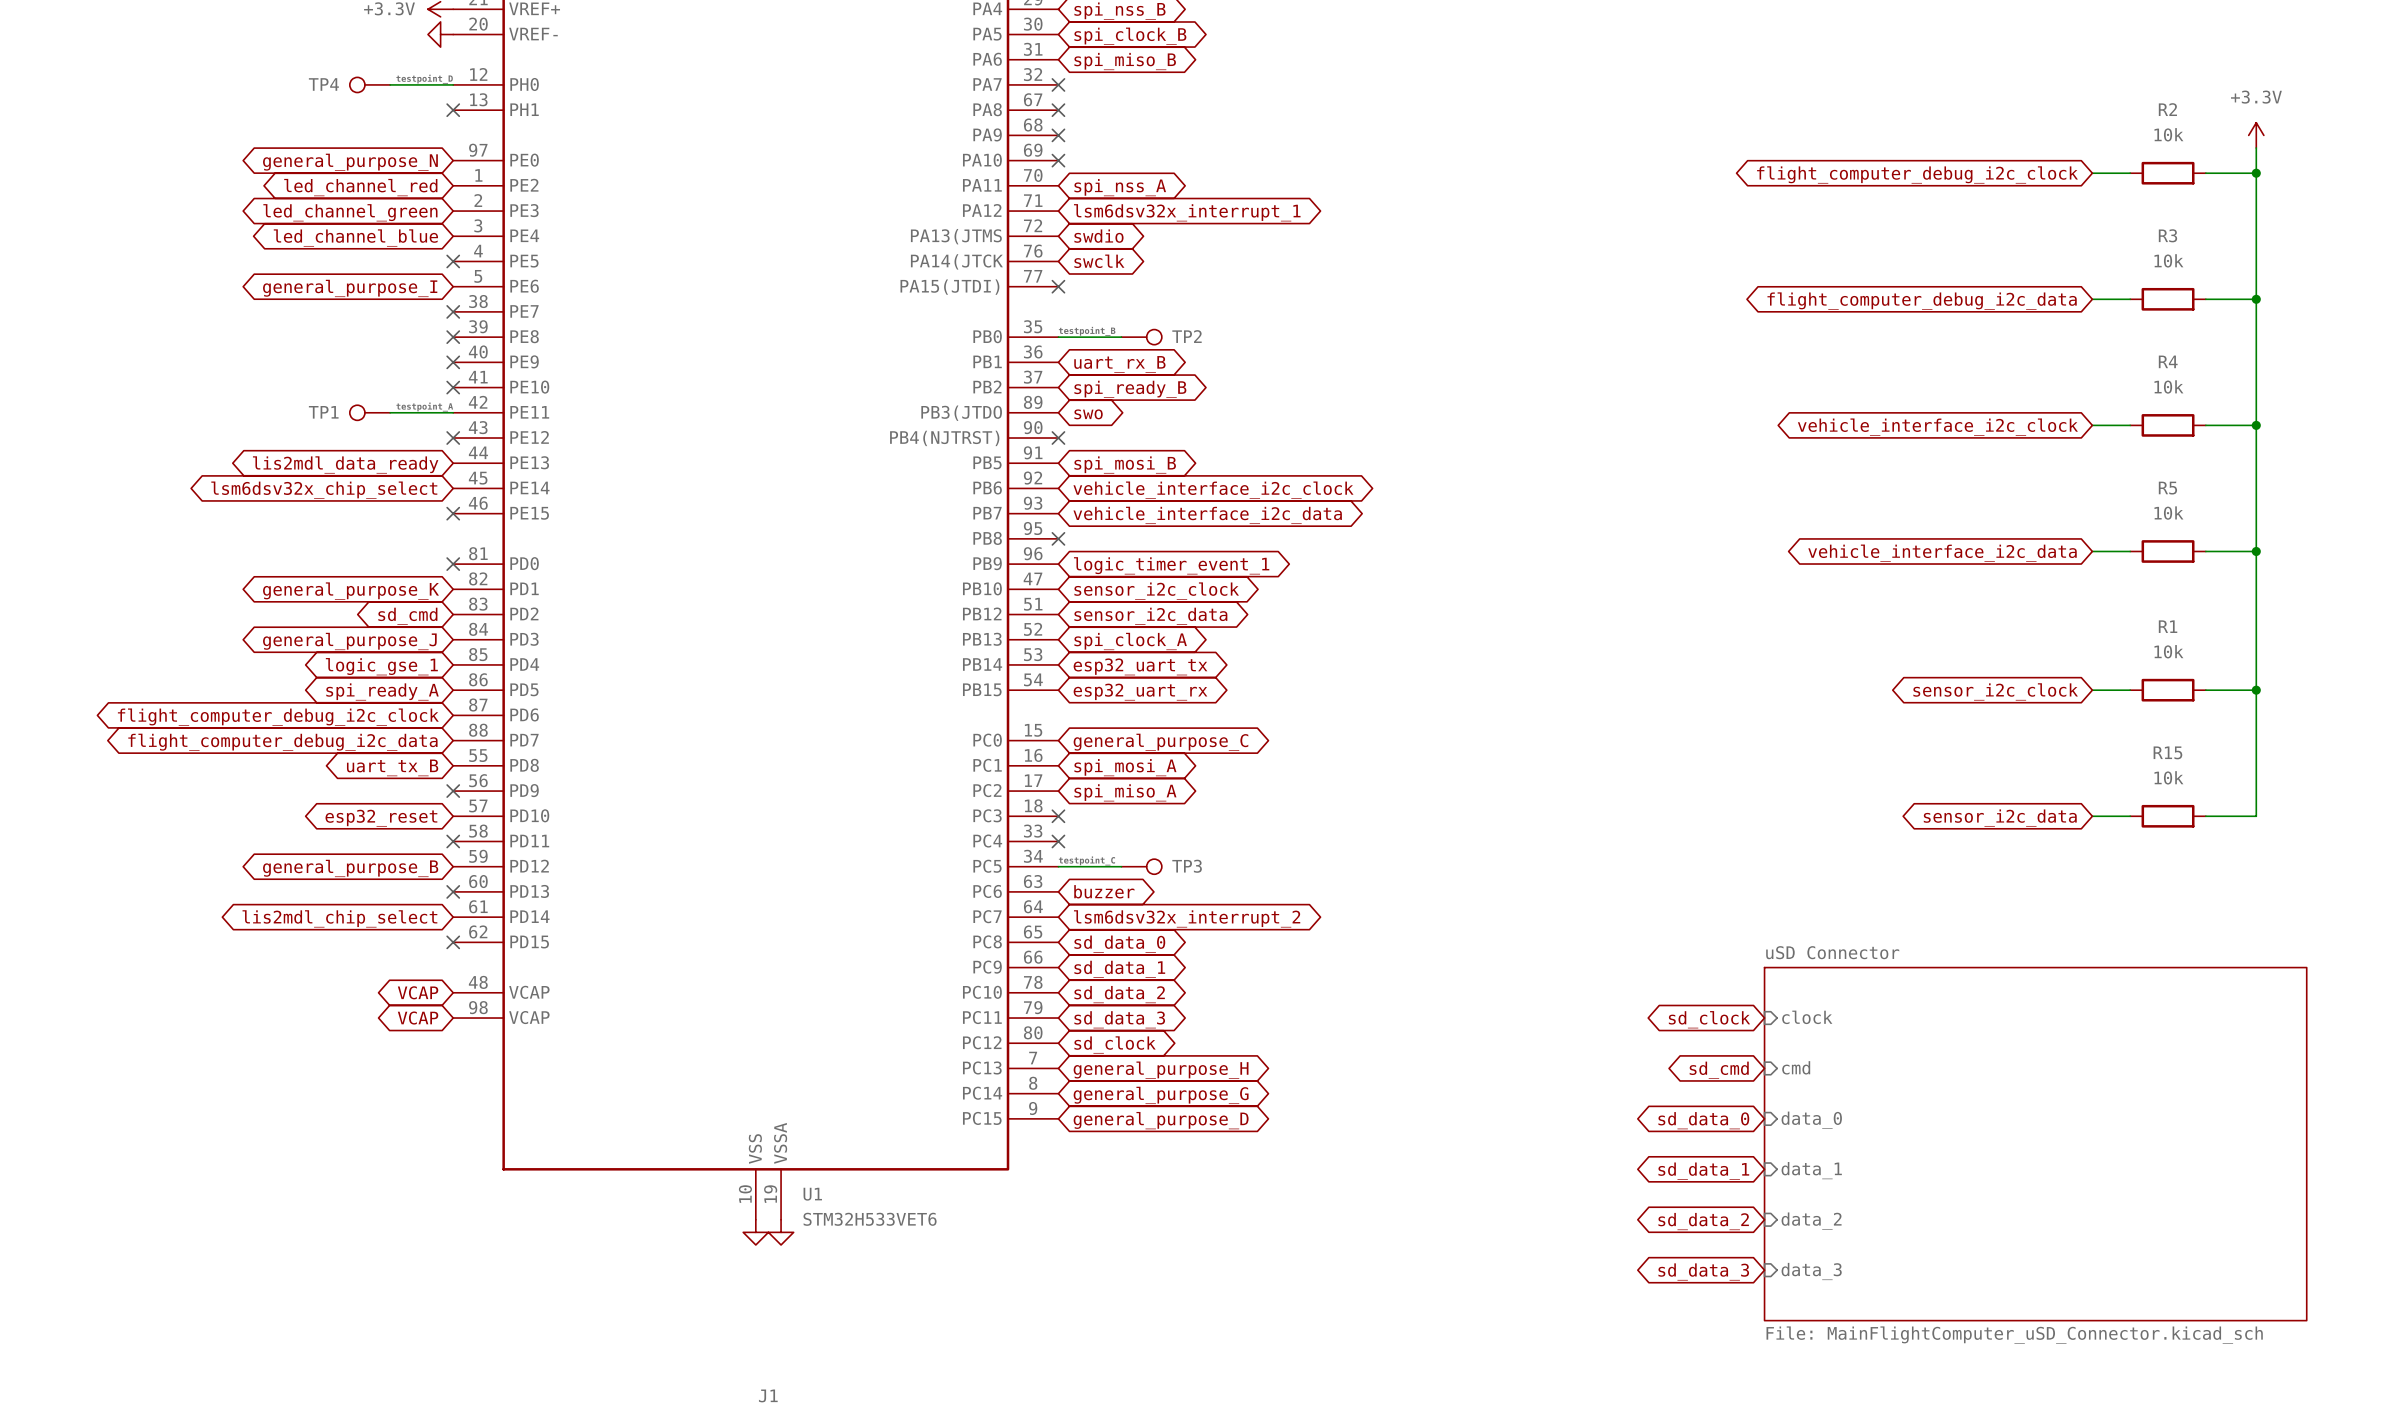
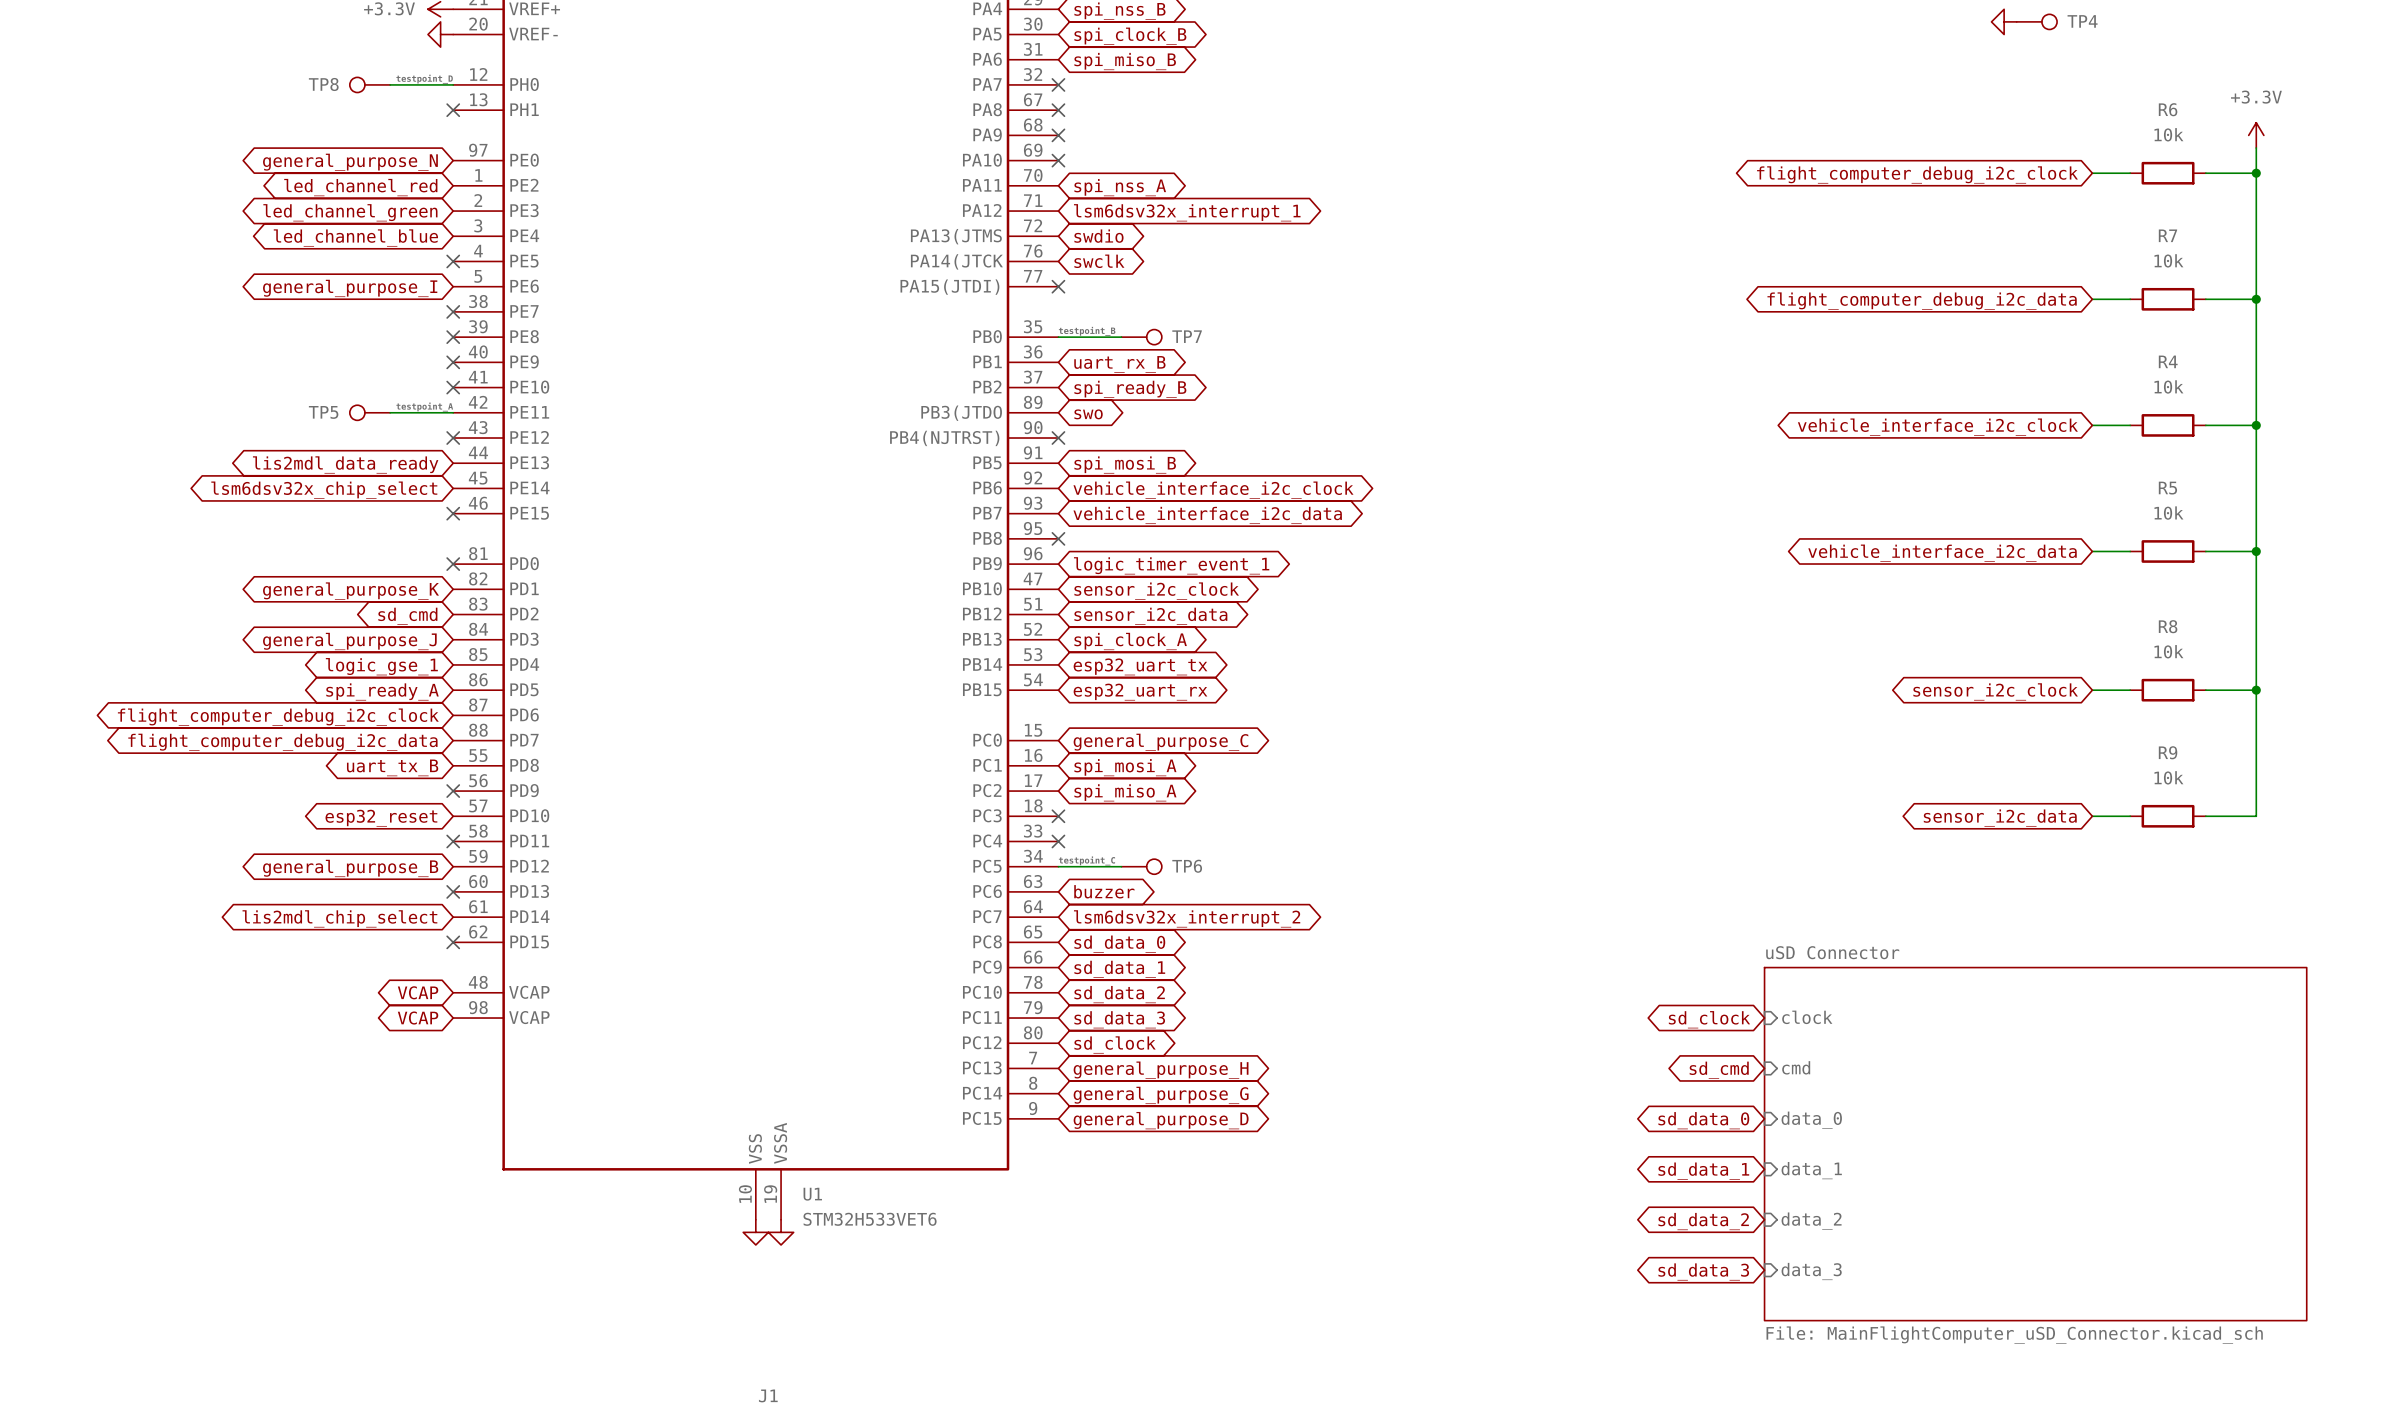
power symbol: none -> (2004, 21)
TP4: none -> (2036, 21)
TP4 name: TP4 (323, 84) -> TP8 (323, 84)
R2 name: R2 (2167, 109) -> R6 (2168, 109)
R3 name: R3 (2167, 235) -> R7 (2167, 235)
TP2 name: TP2 (1187, 336) -> TP7 (1187, 336)
TP1 name: TP1 (323, 412) -> TP5 (323, 412)
R1 name: R1 (2168, 626) -> R8 (2168, 626)
R15 name: R15 (2167, 752) -> R9 (2168, 752)
TP3 name: TP3 (1187, 866) -> TP6 (1187, 866)

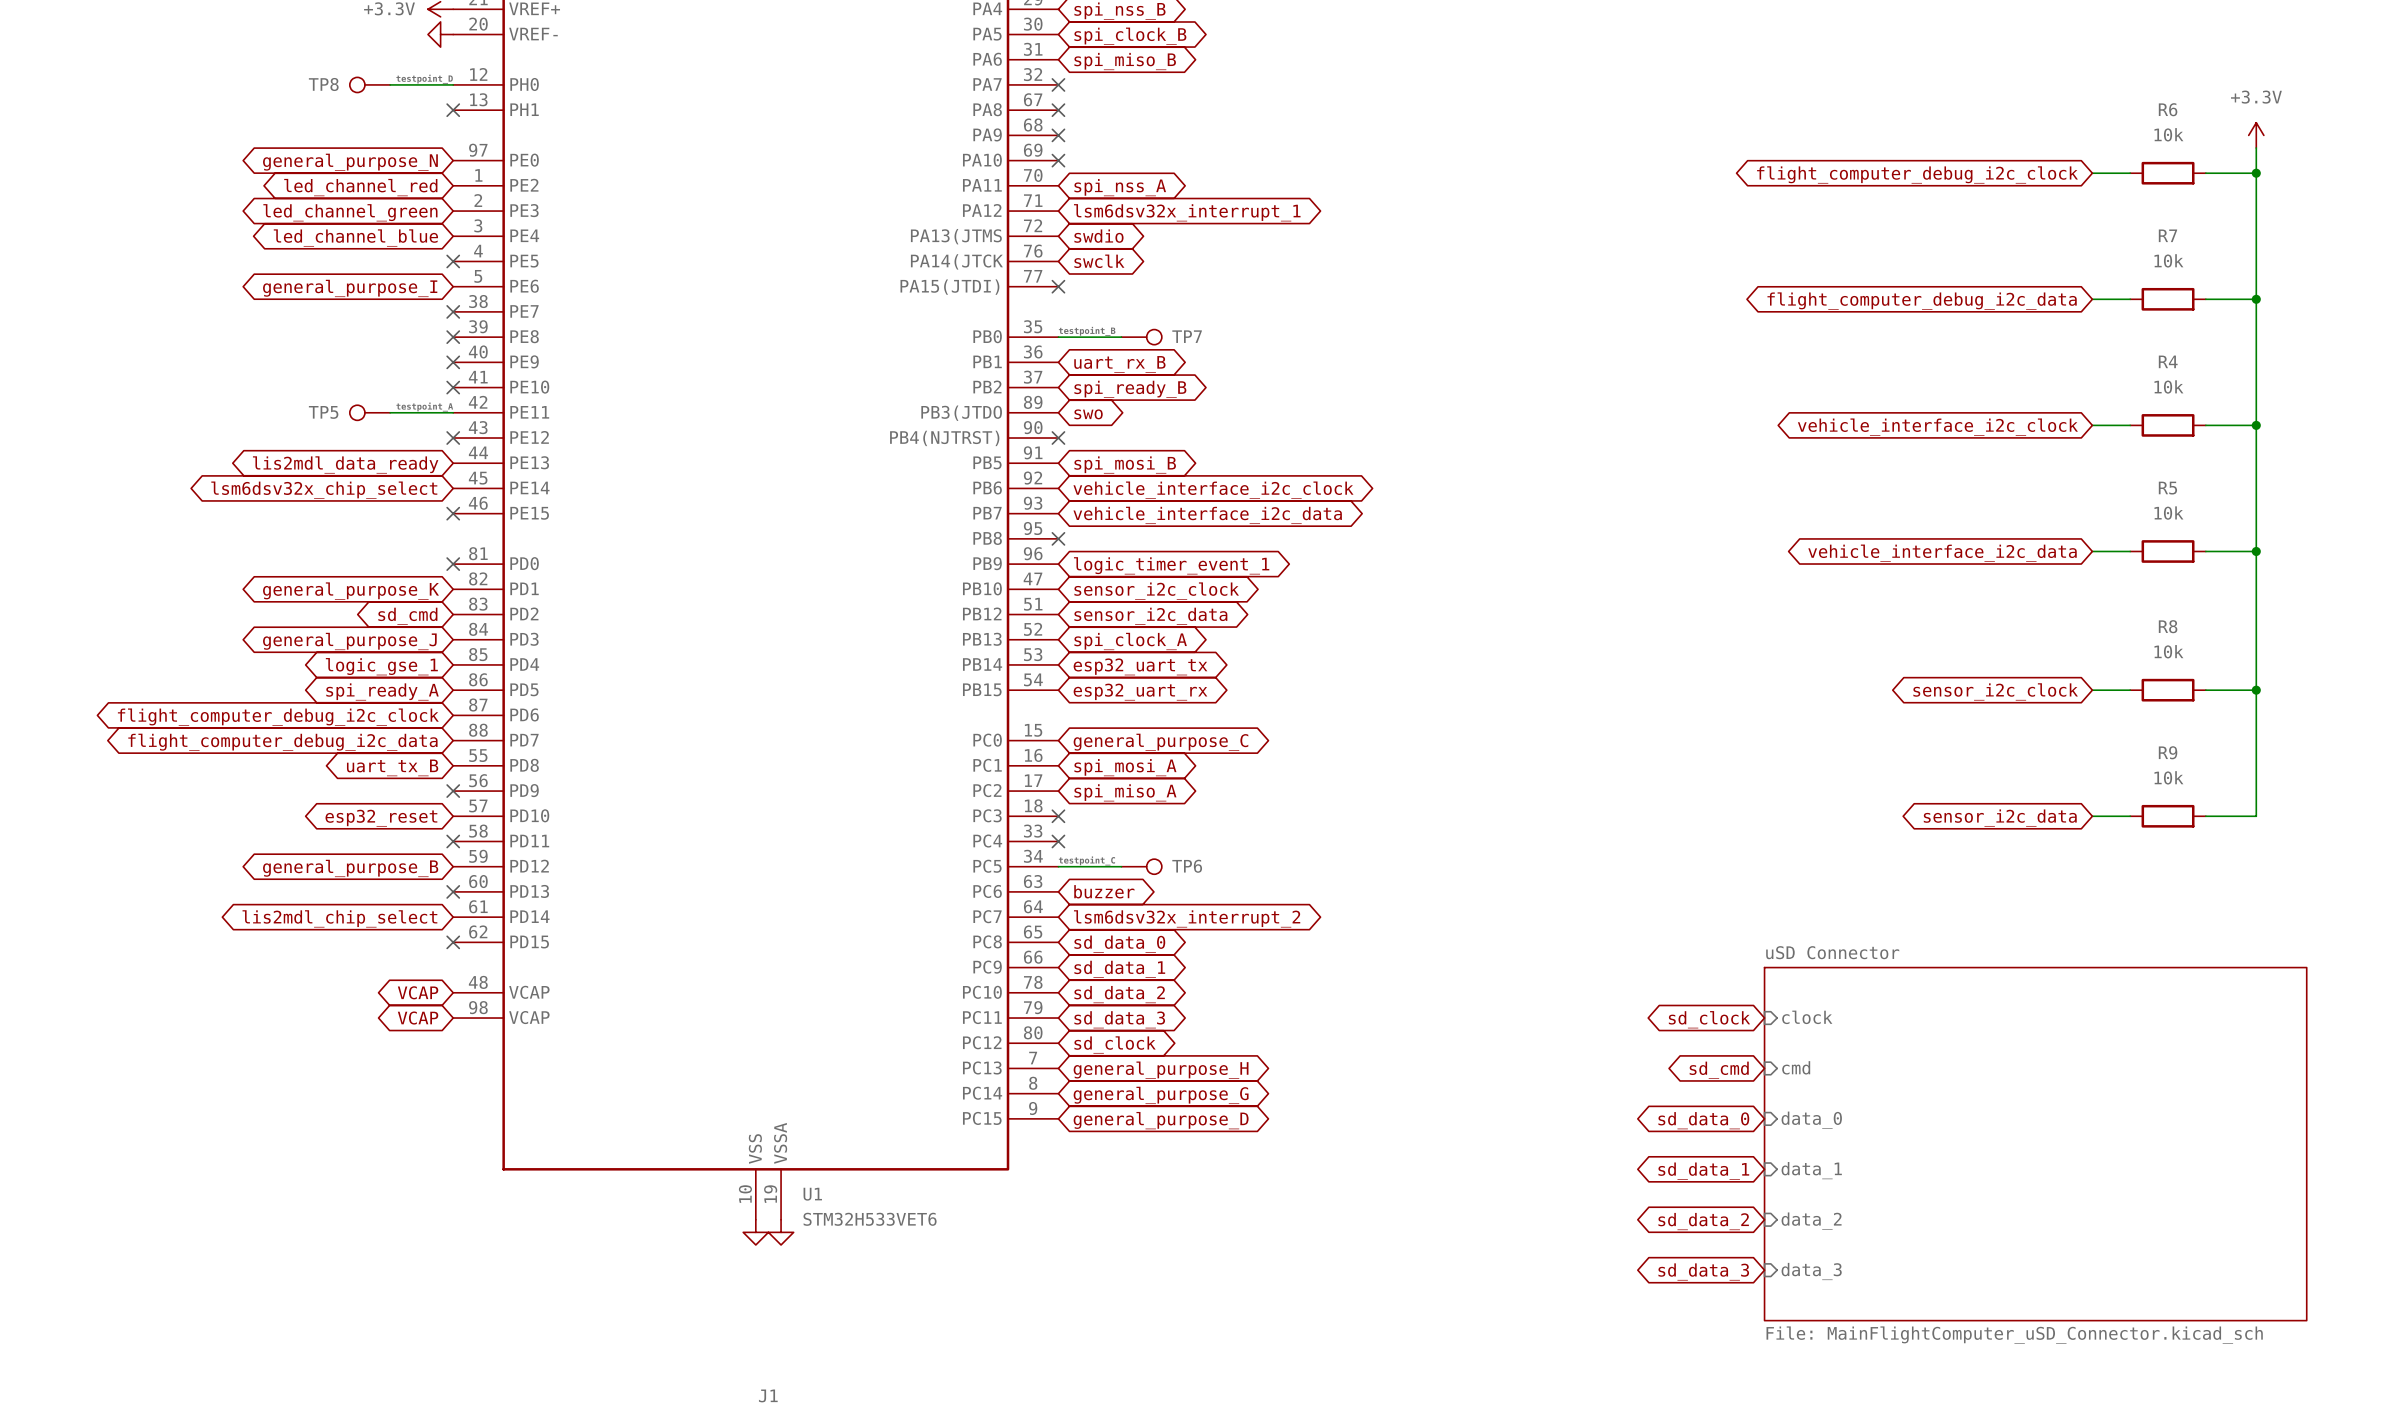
power symbol: (2004, 21) -> none
TP4: (2036, 21) -> none

